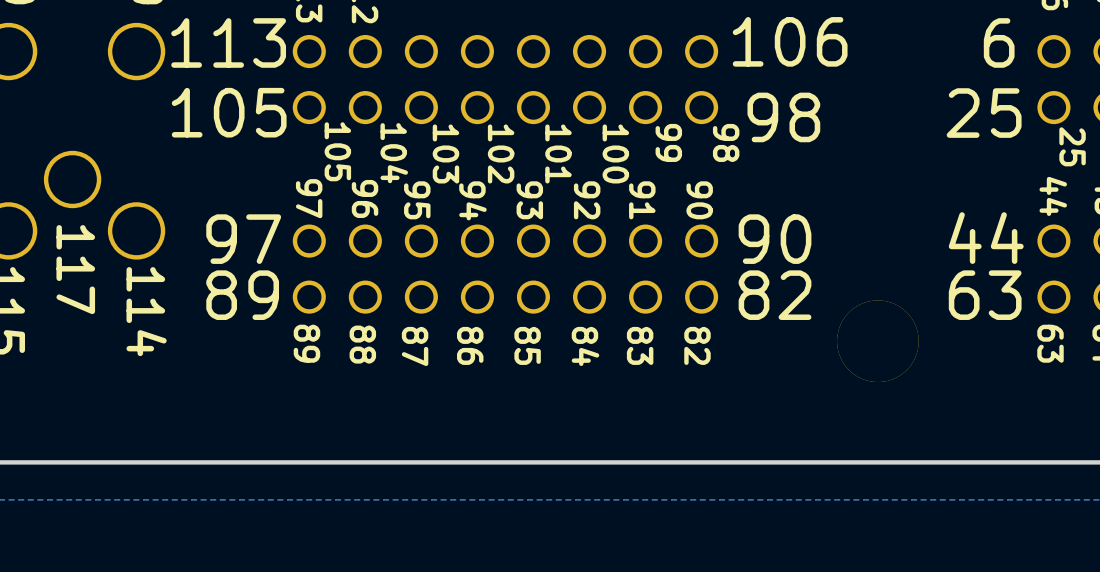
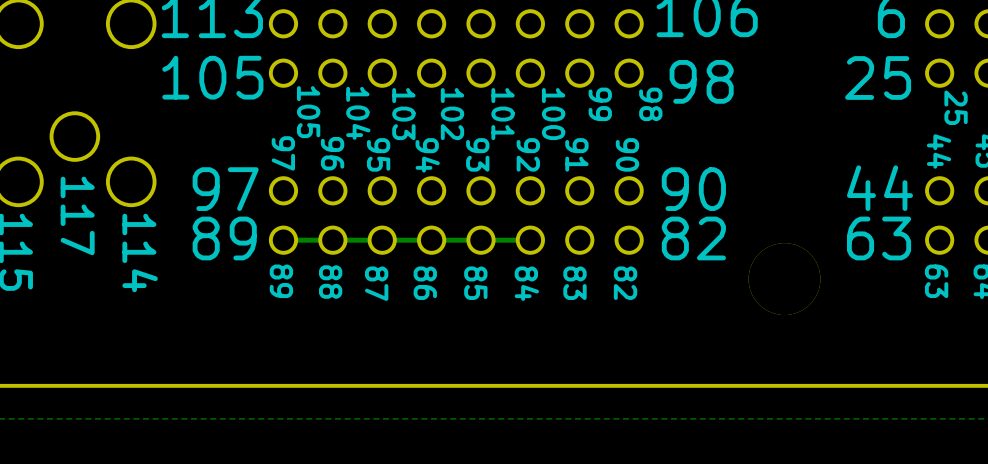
track: none -> (530, 240) (283, 240)

